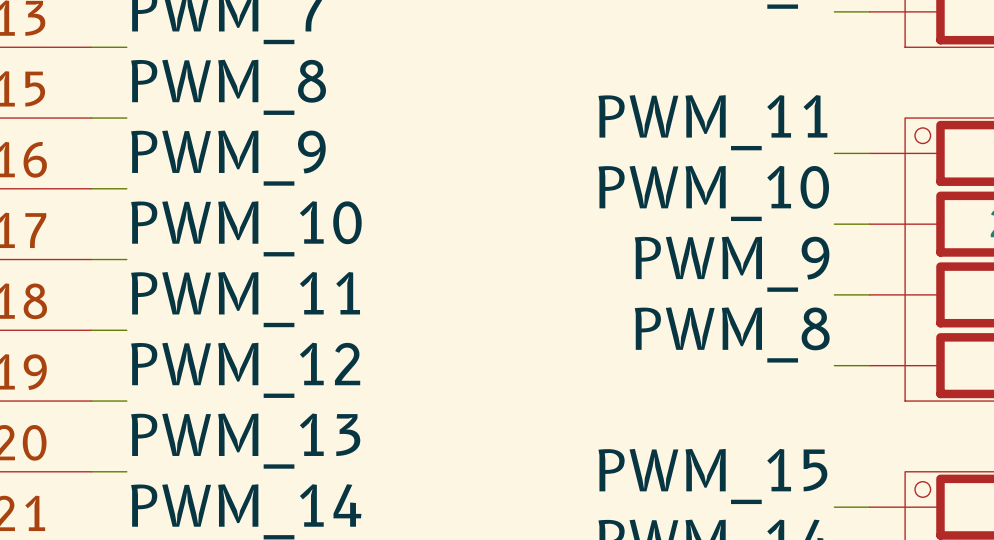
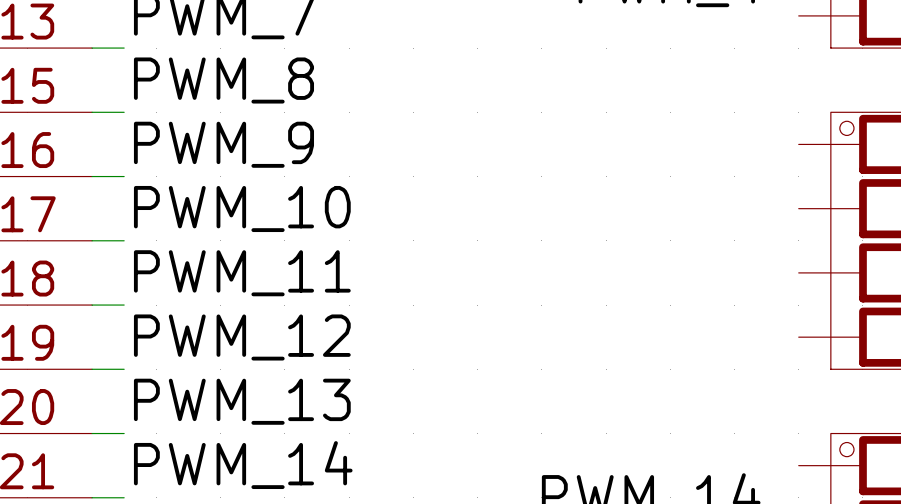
wire: (834, 11) (869, 11) -> none
label: PWM_11 (712, 122) -> none
wire: (834, 153) (869, 153) -> none
label: PWM_10 (713, 193) -> none
wire: (834, 224) (869, 224) -> none
label: PWM_9 (732, 264) -> none
wire: (834, 294) (869, 294) -> none
label: PWM_8 (732, 334) -> none
wire: (834, 365) (869, 365) -> none
label: PWM_15 (712, 476) -> none
wire: (834, 507) (869, 507) -> none

